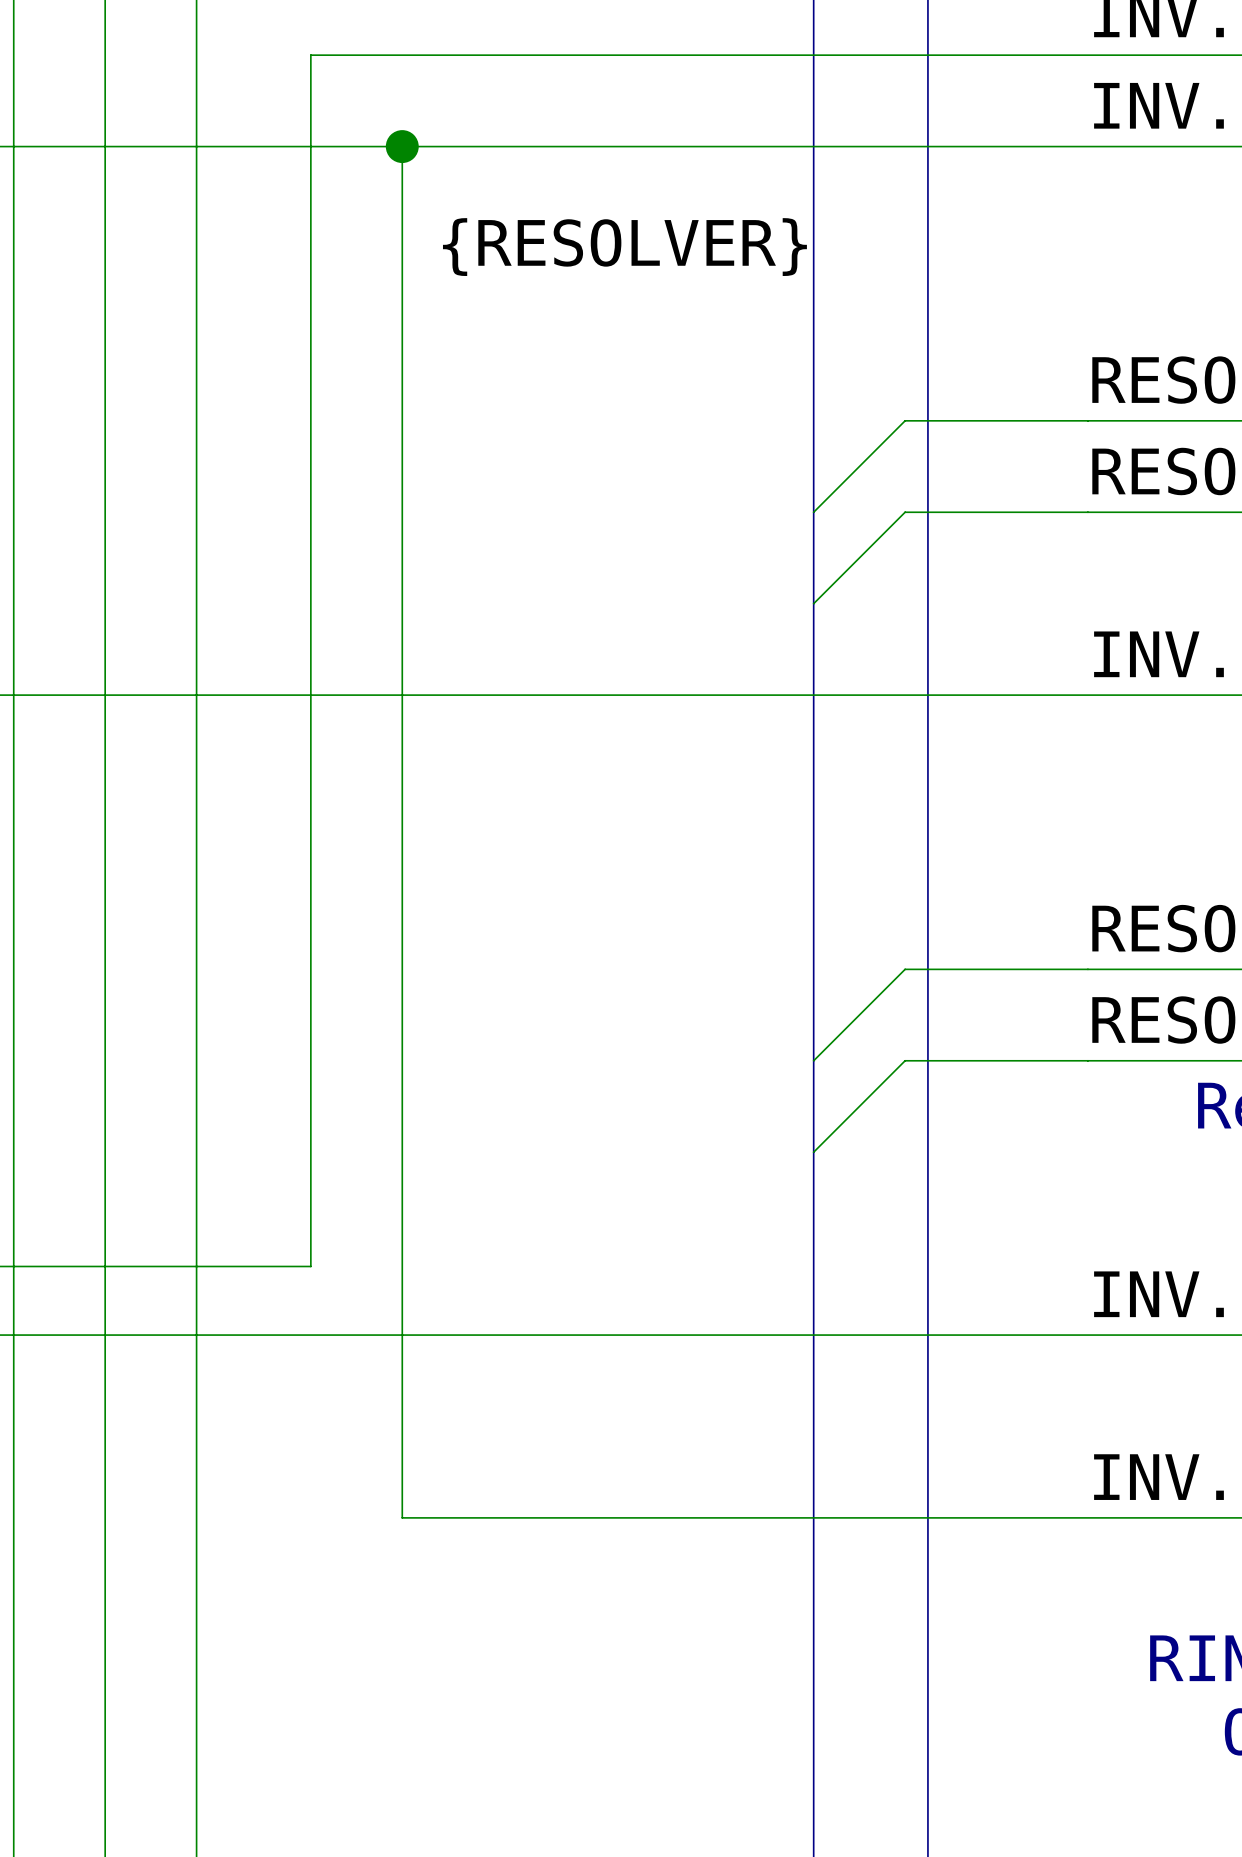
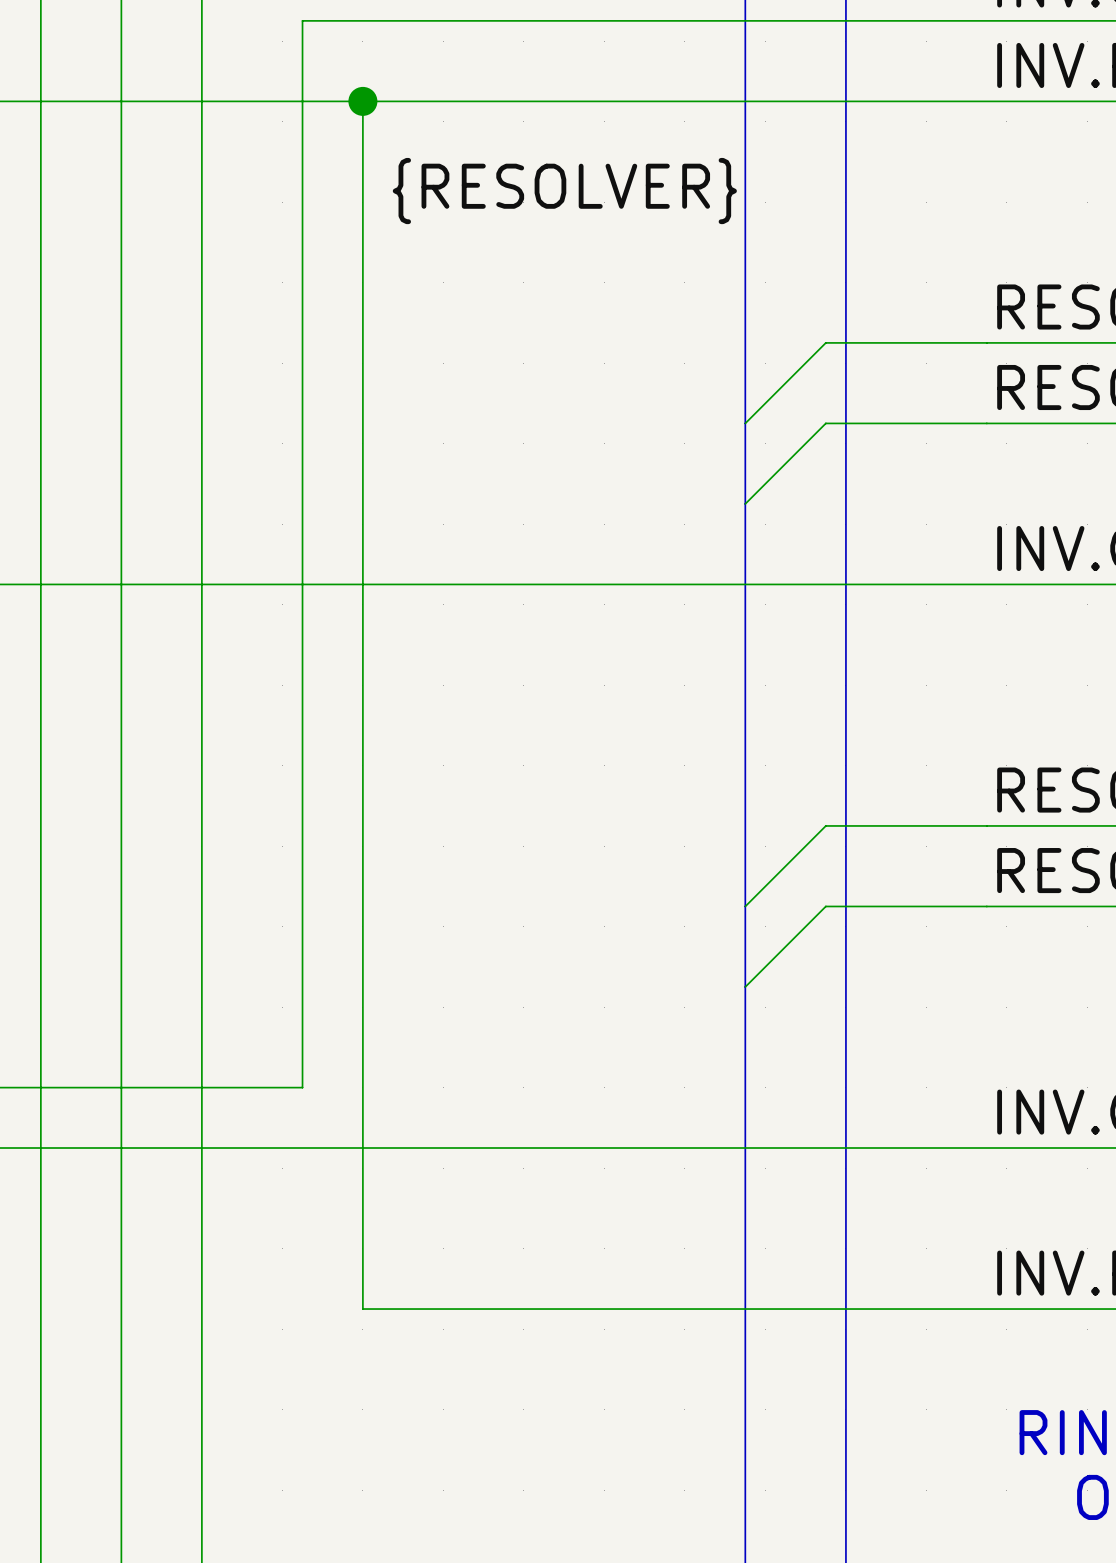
wire: (402, 146) (402, 1517) -> (362, 101) (362, 1309) (383, 1309)
junction position: (402, 146) -> (362, 101)

